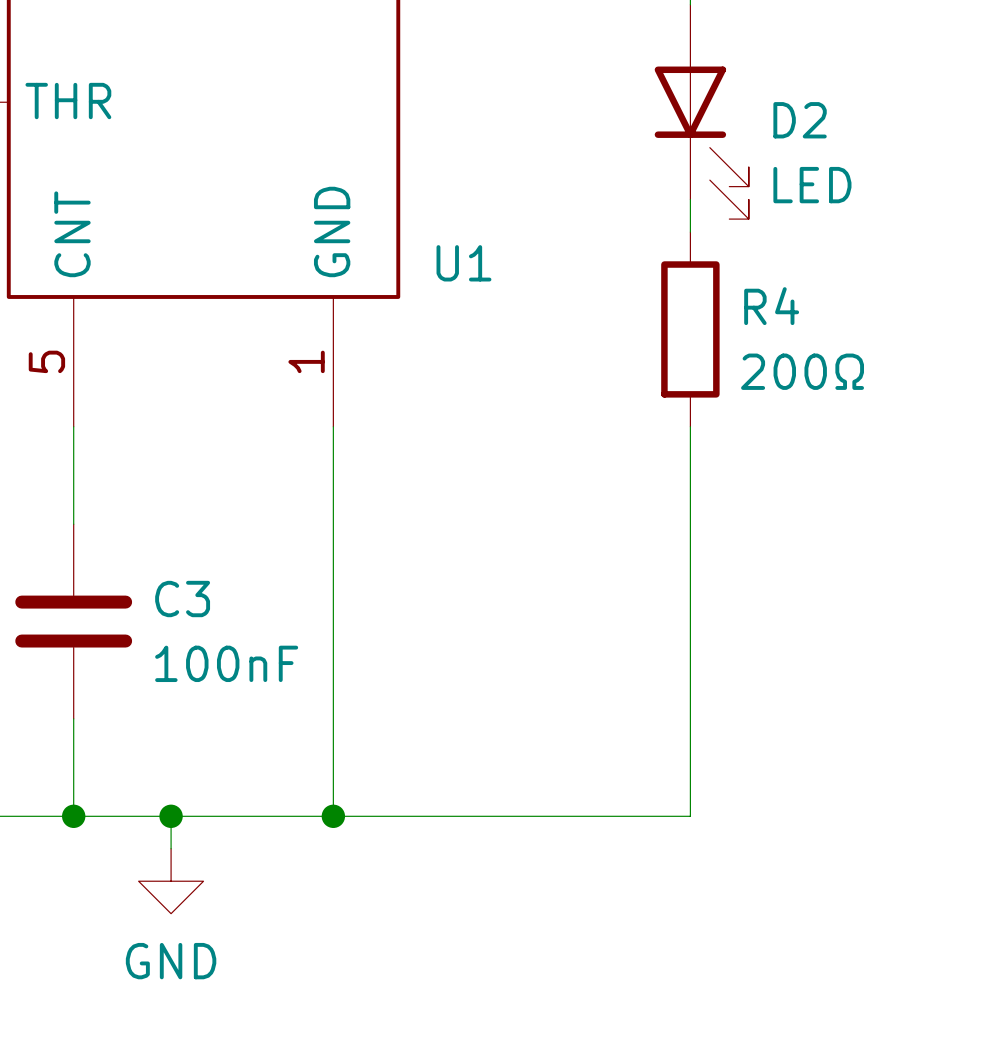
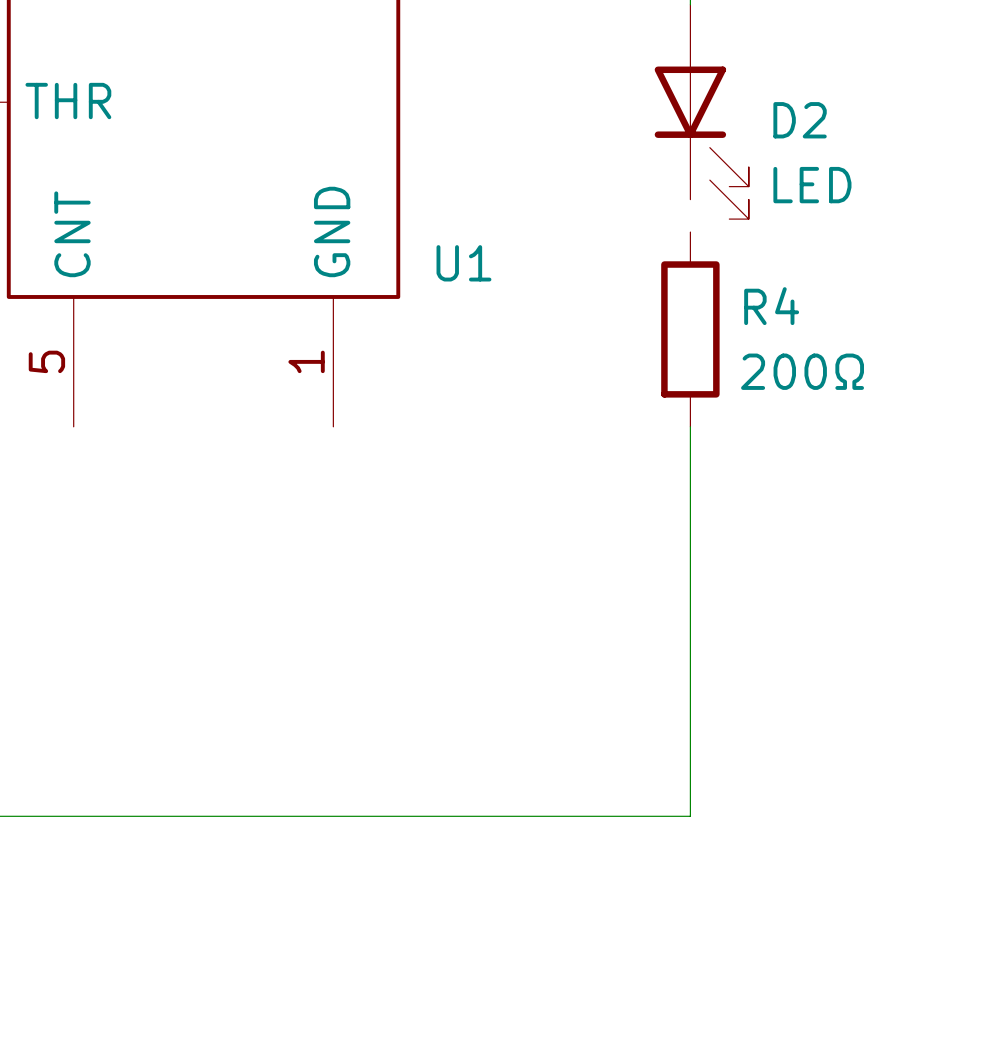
wire: (690, 199) (690, 232) -> none
wire: (73, 426) (73, 524) -> none
wire: (333, 426) (333, 816) -> none
C3: 100nF (73, 621) -> none
wire: (73, 718) (73, 816) -> none
junction: (73, 816) -> none
wire: (171, 816) (171, 848) -> none
junction: (171, 816) -> none
junction: (333, 816) -> none
power symbol: GND (171, 881) -> none

